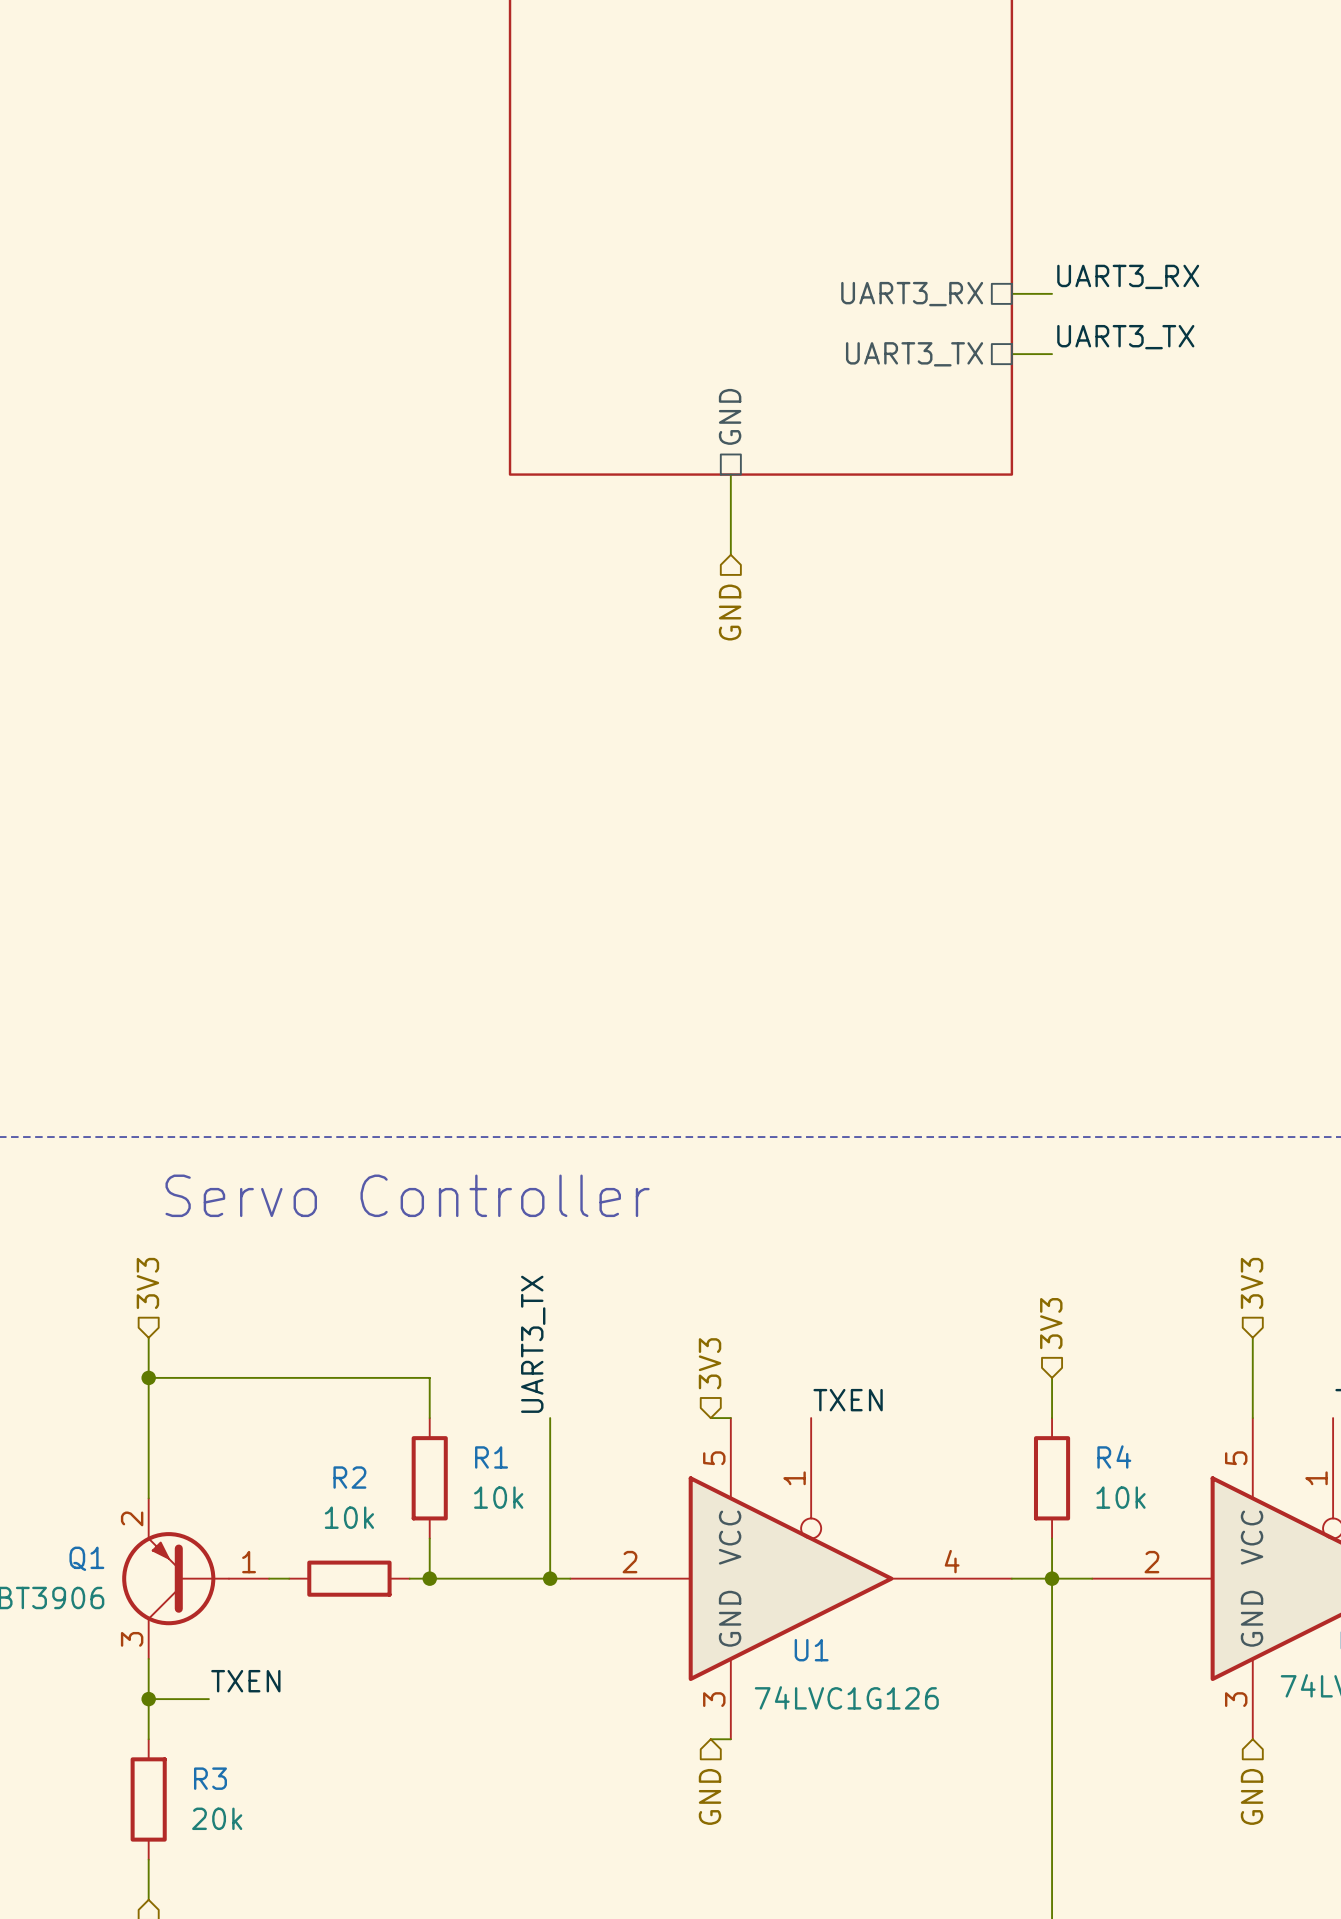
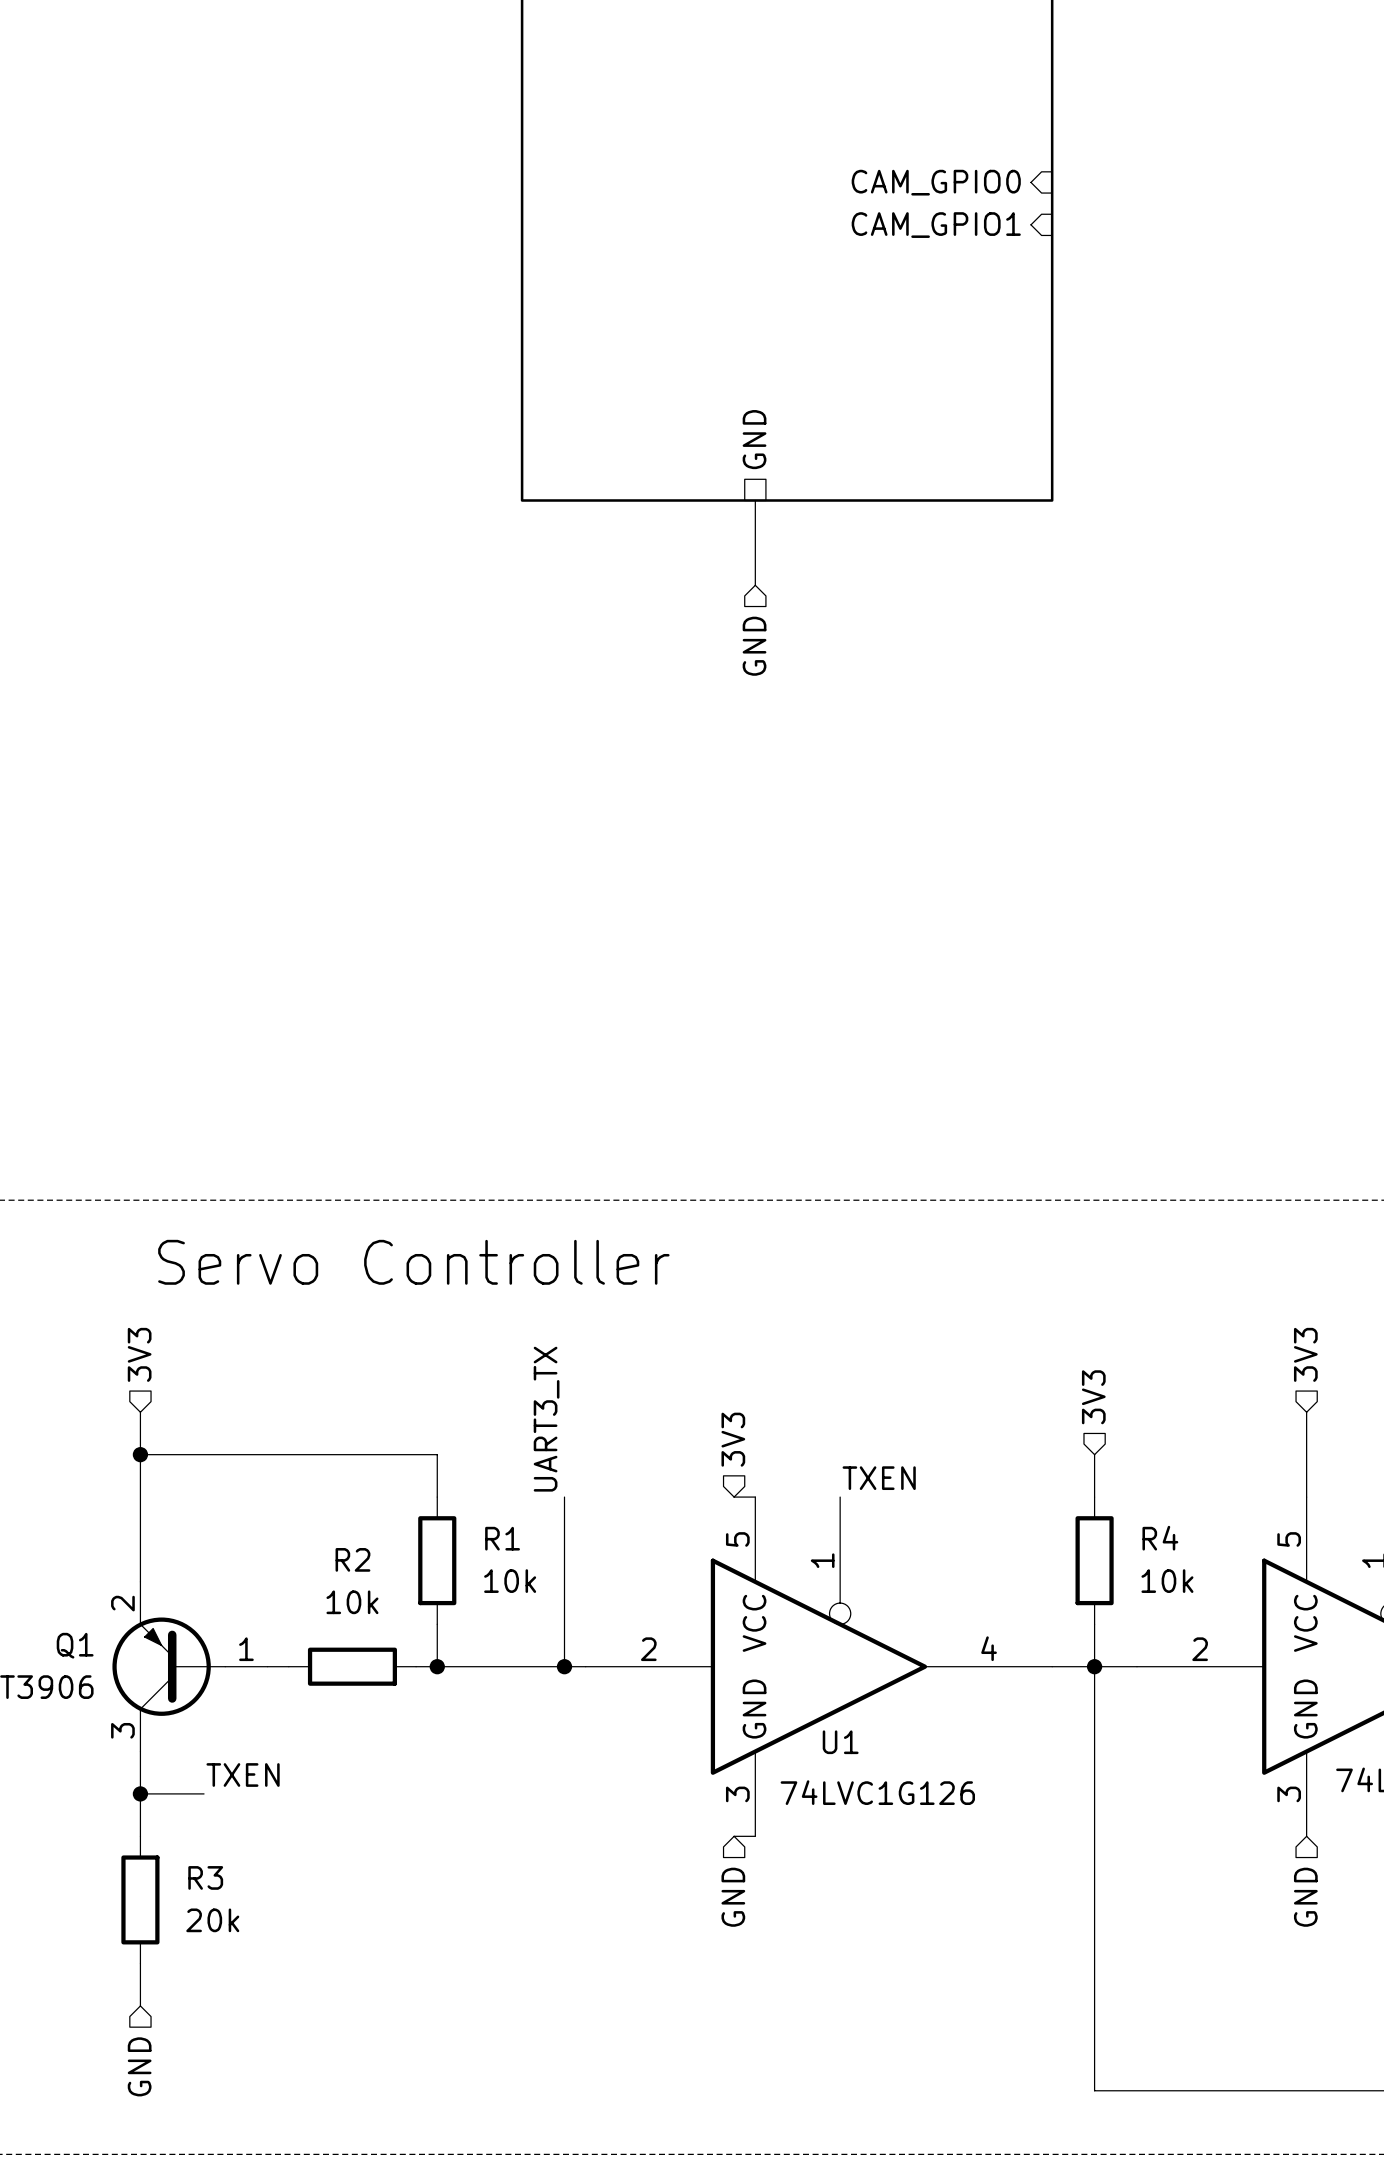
sheet pin: none -> CAM_GPIO0 (936, 182)
sheet pin: none -> CAM_GPIO1 (936, 225)
label: UART3_RX (1128, 276) -> none
wire: (1011, 293) (1052, 293) -> none
sheet pin: UART3_RX (912, 294) -> none
label: UART3_TX (1125, 337) -> none
sheet pin: UART3_TX (914, 354) -> none
wire: (1011, 354) (1052, 354) -> none

